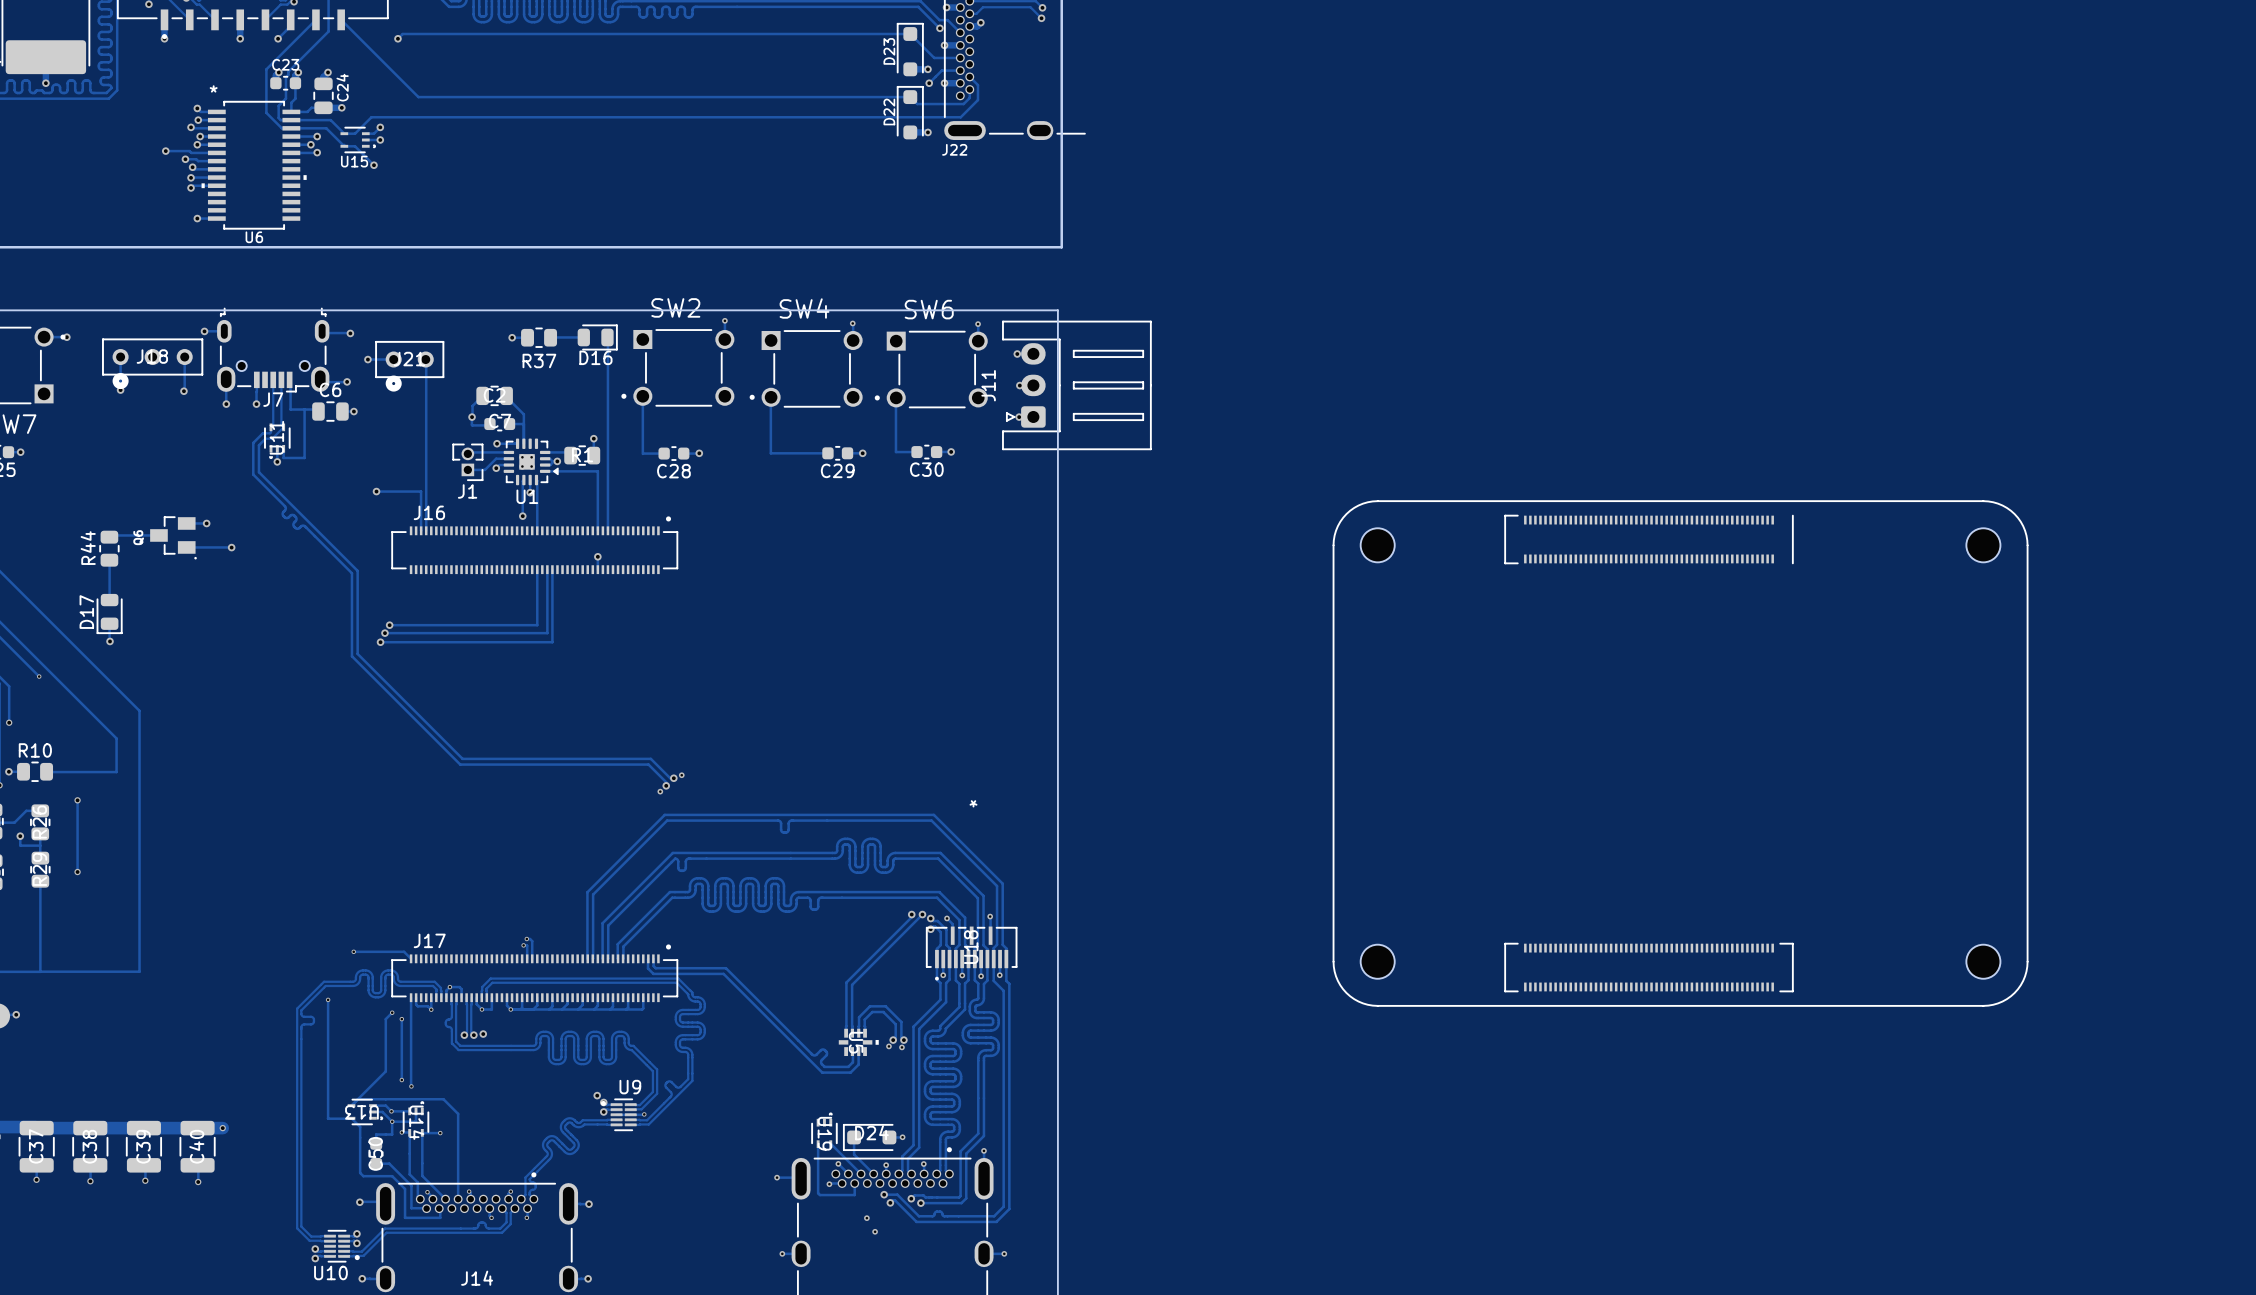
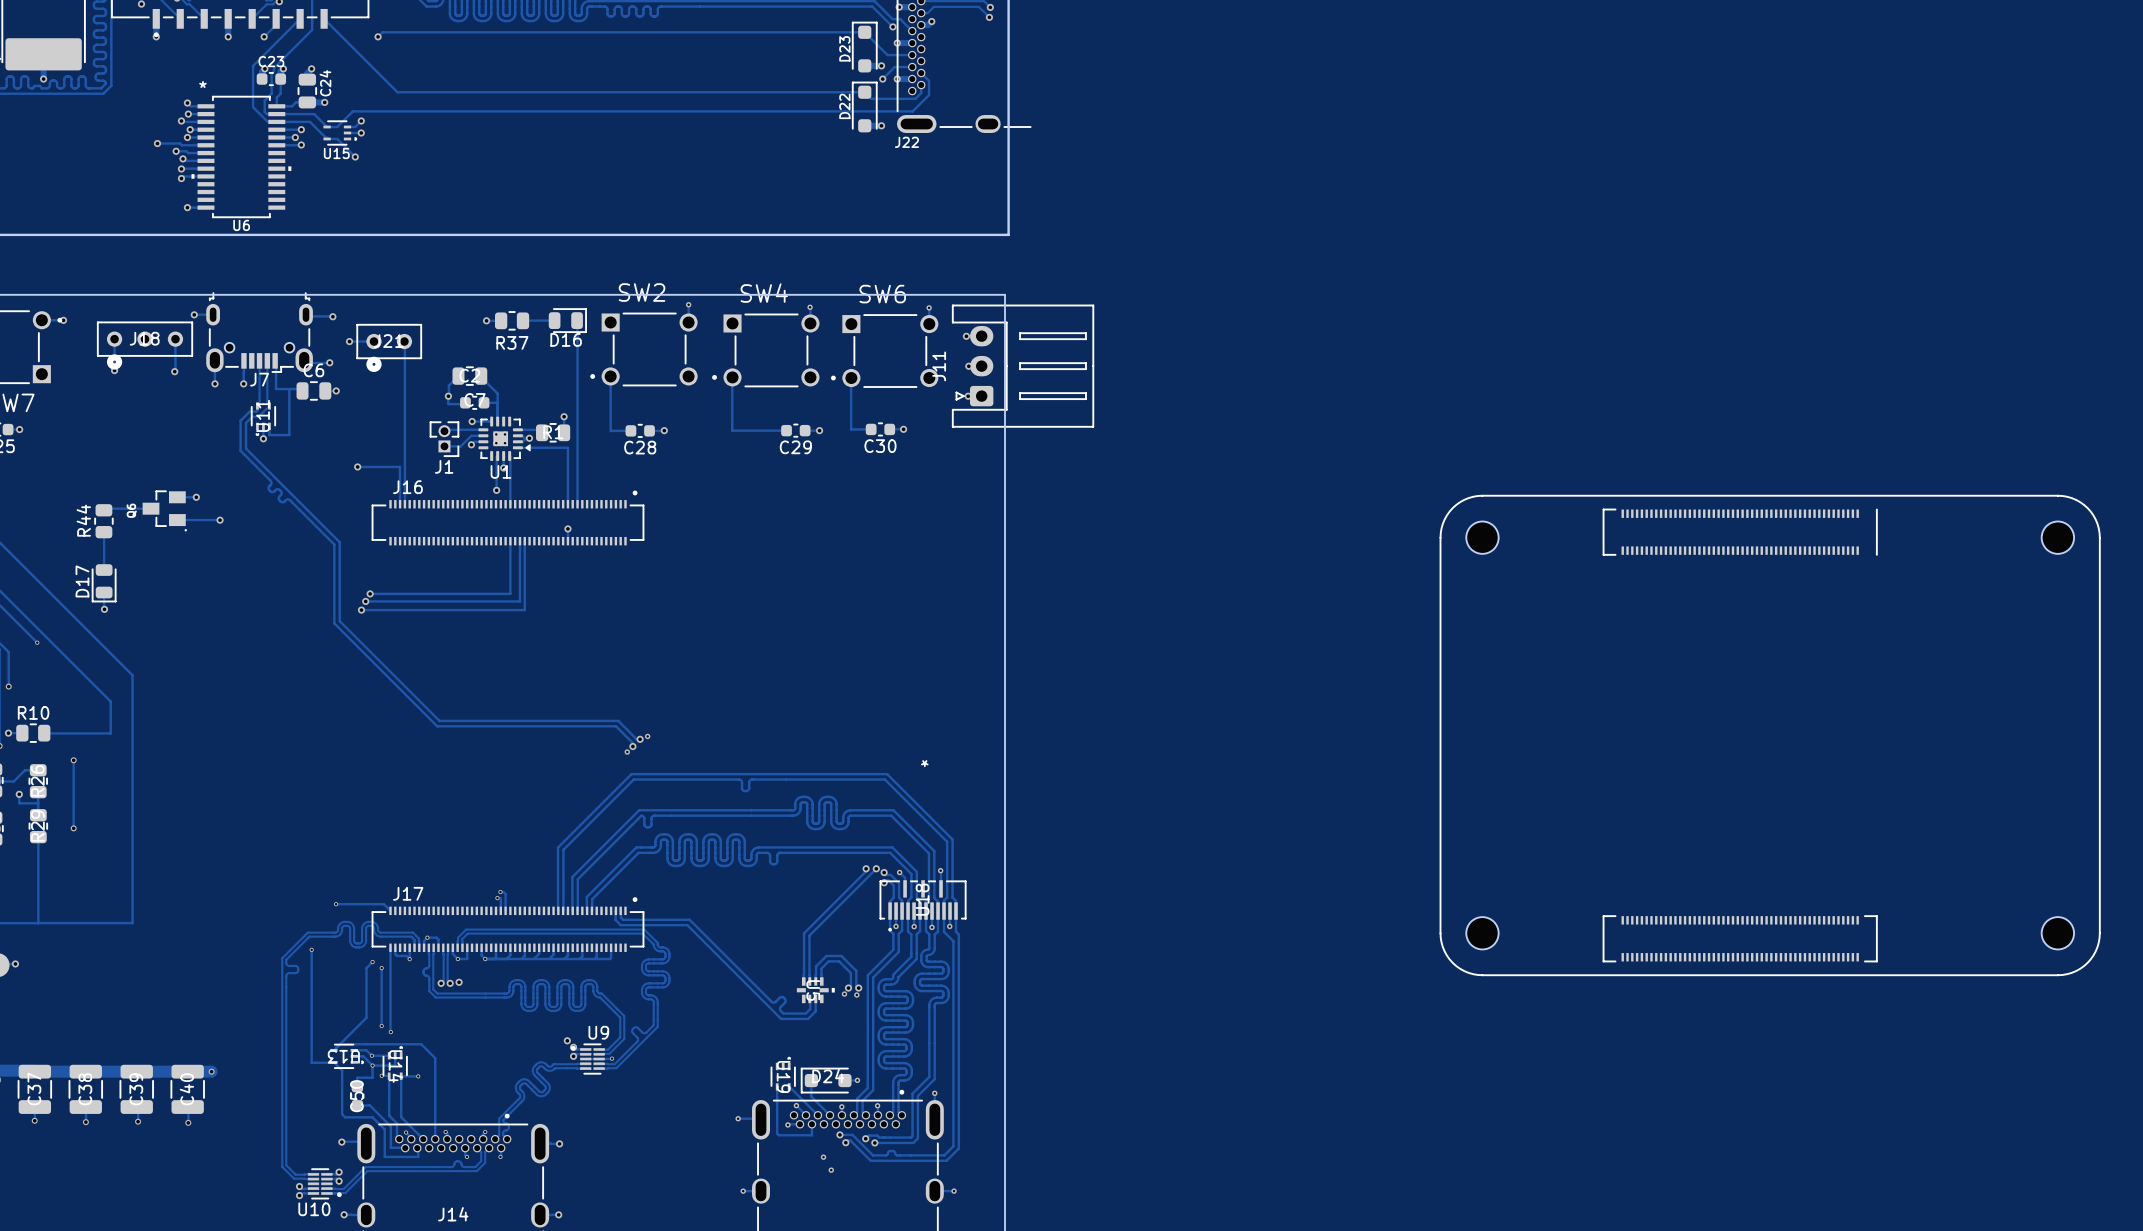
part position: (1680, 753) -> (1770, 735)

